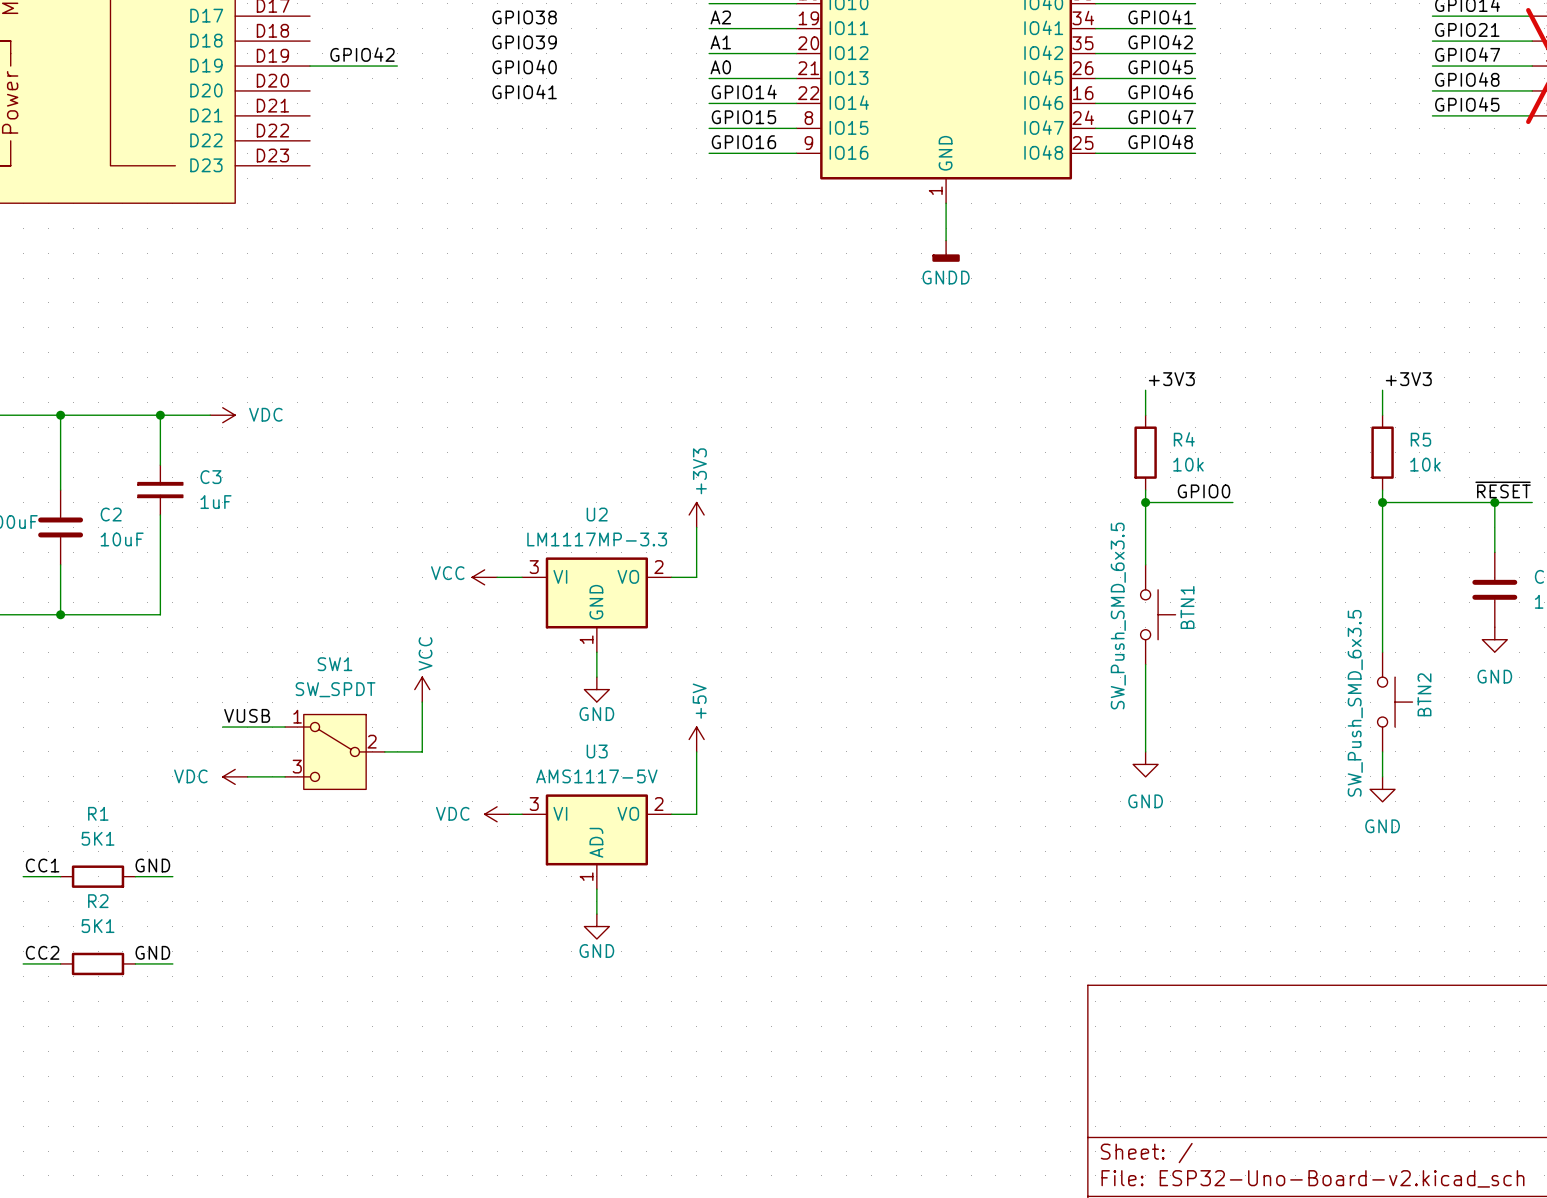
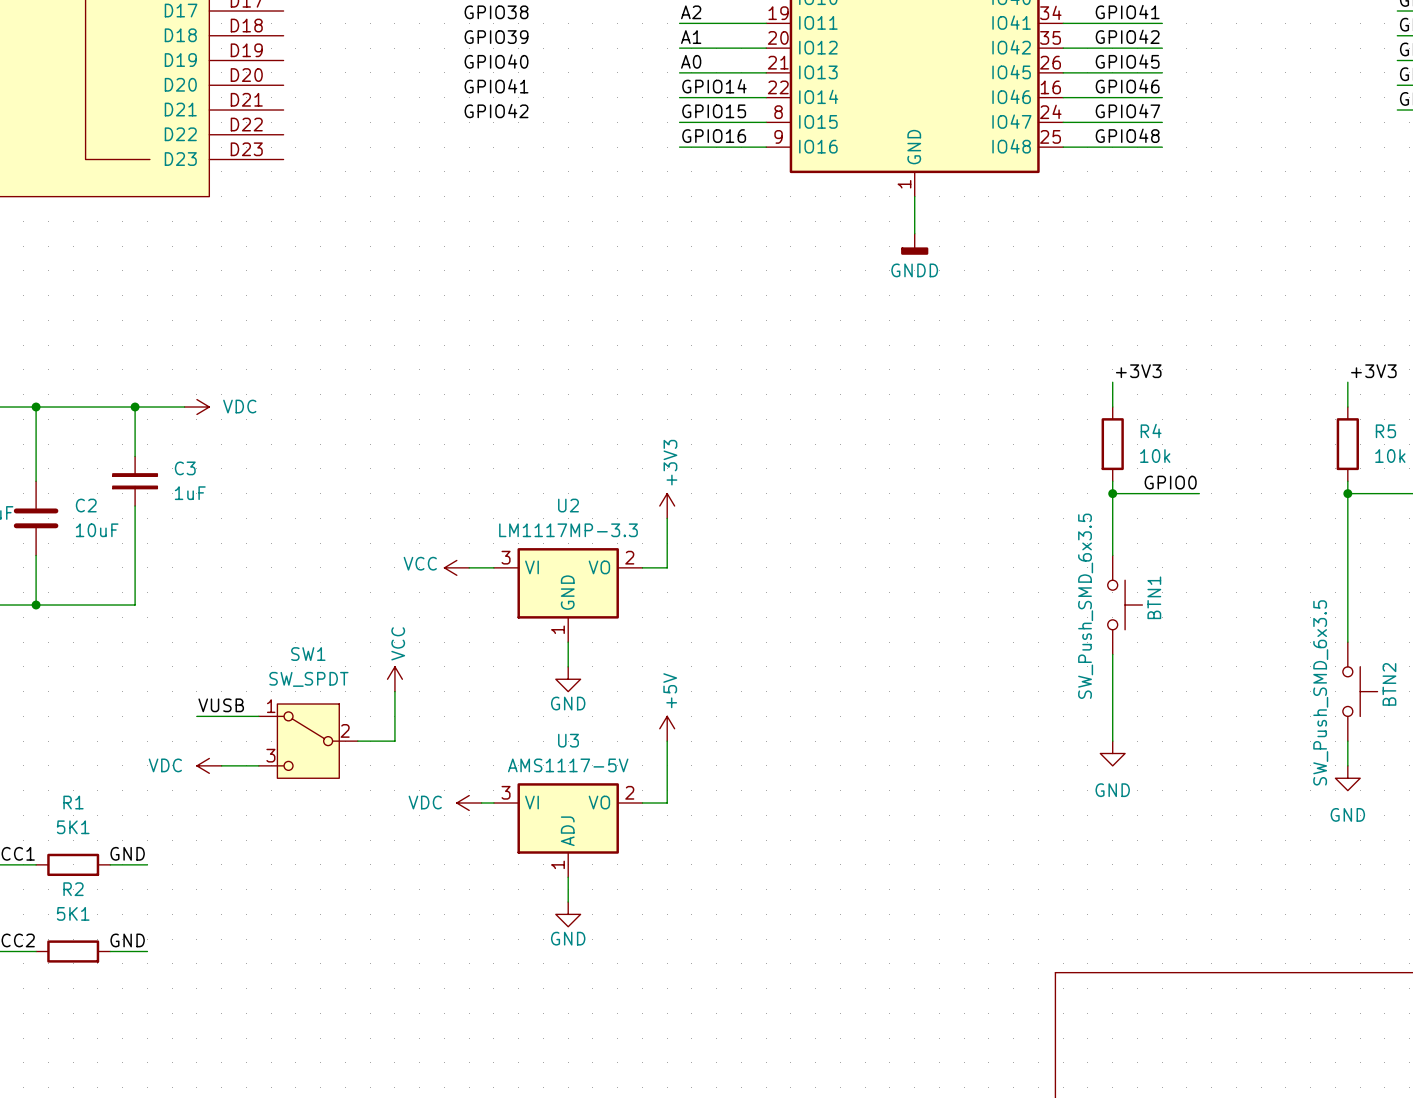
label position: GPIO42 (362, 54) -> GPIO42 (496, 111)
wire: (310, 66) (397, 66) -> none

